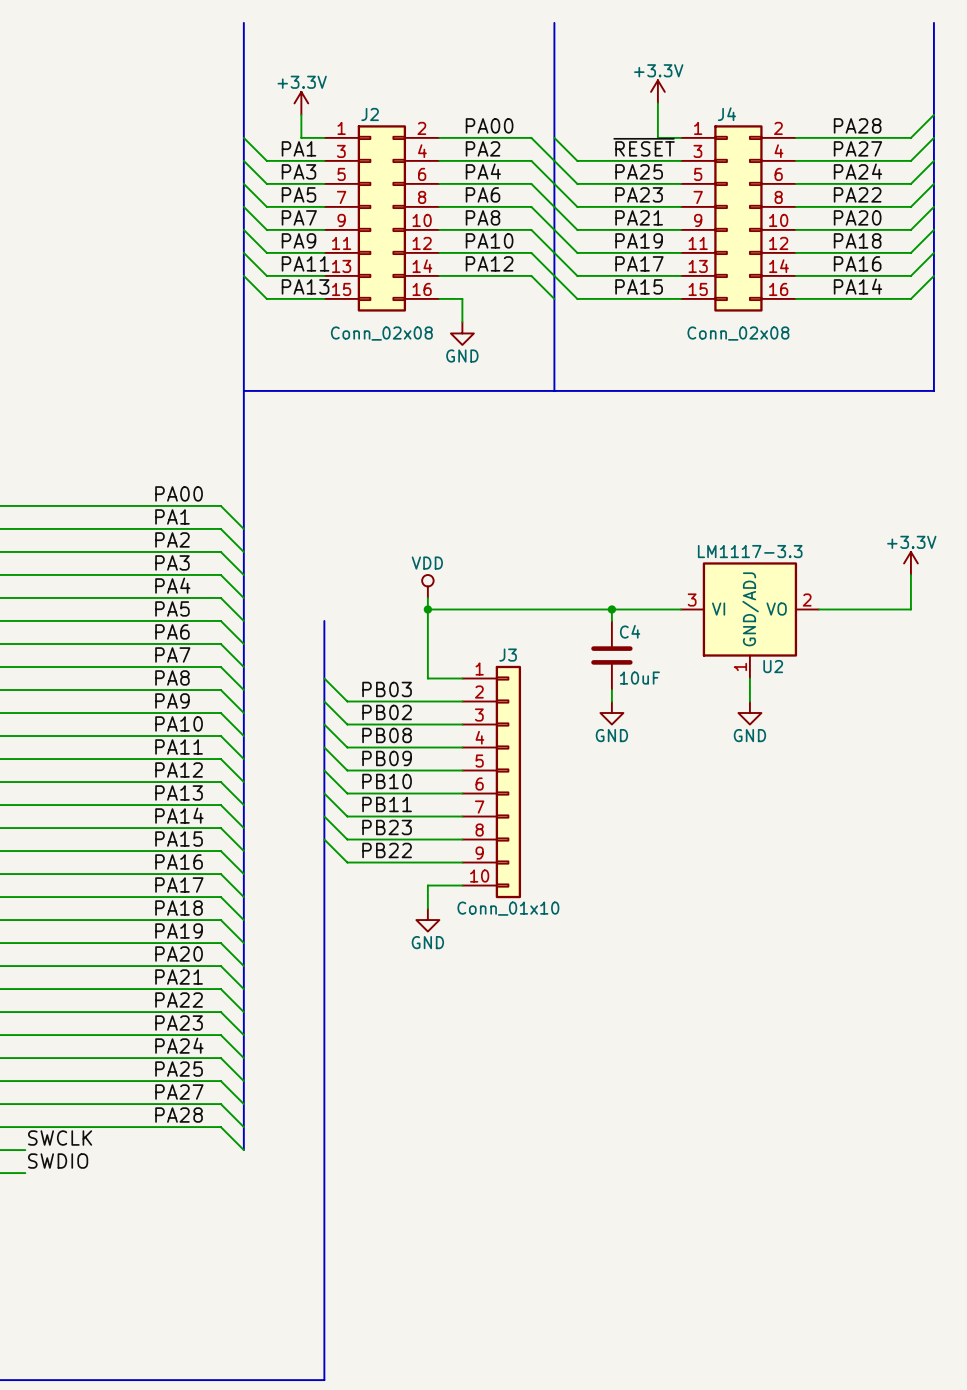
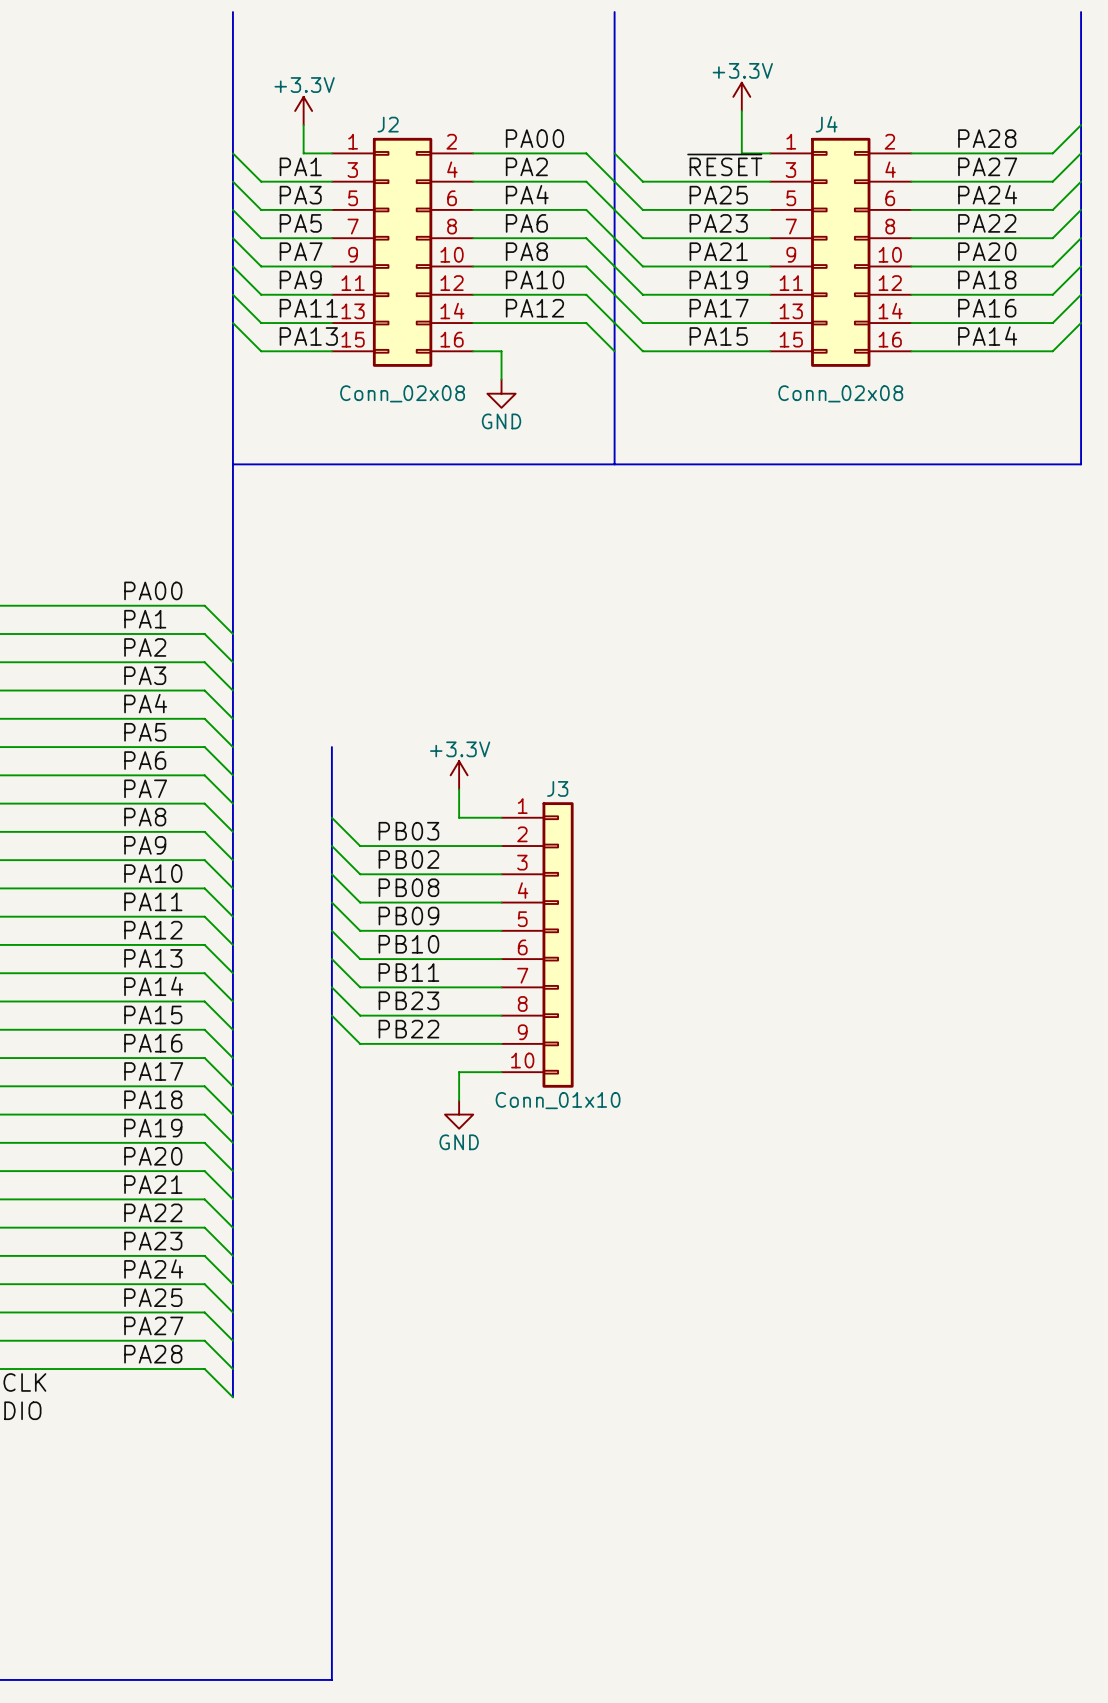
power symbol: +3.3V (910, 563) -> none
wire: (910, 574) (910, 609) (818, 609) -> none
power symbol: VDD (427, 586) -> none
wire: (427, 597) (427, 655) -> none
wire: (427, 609) (680, 609) -> none
junction: (427, 609) -> none
wire: (611, 609) (611, 620) -> none
junction: (611, 609) -> none
U2: LM1117-3.3 (749, 620) -> none
power symbol: none -> +3.3V (459, 775)
C4: 10uF (611, 655) -> none
wire: (749, 678) (749, 701) -> none
wire: (611, 690) (611, 701) -> none
power symbol: GND (611, 713) -> none
power symbol: GND (749, 713) -> none

